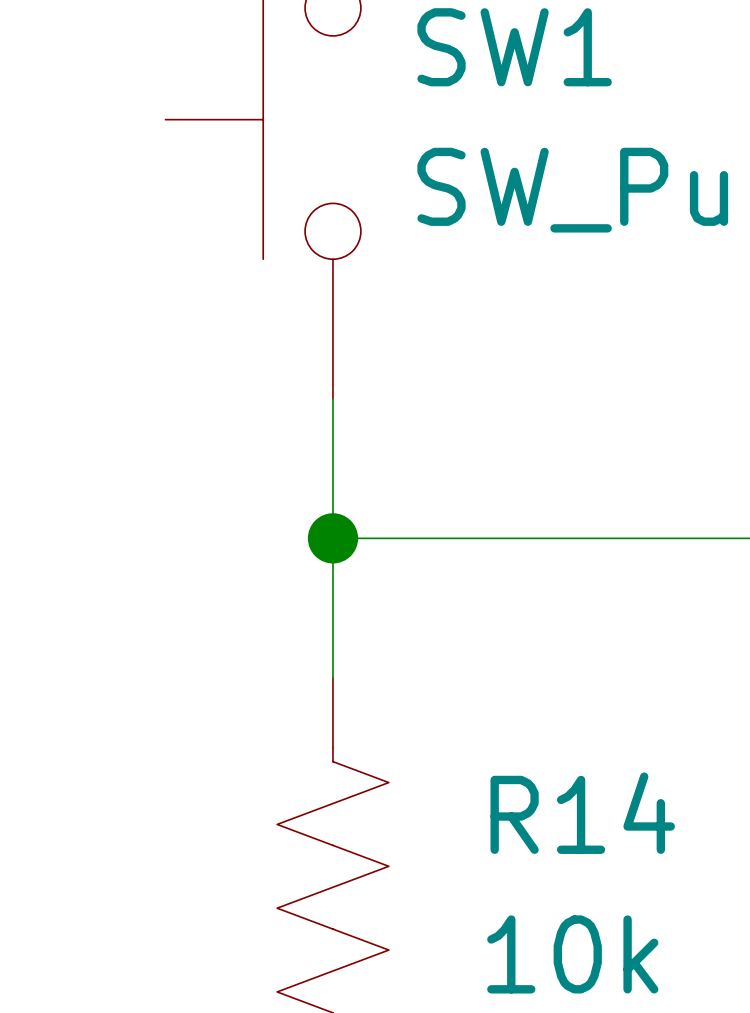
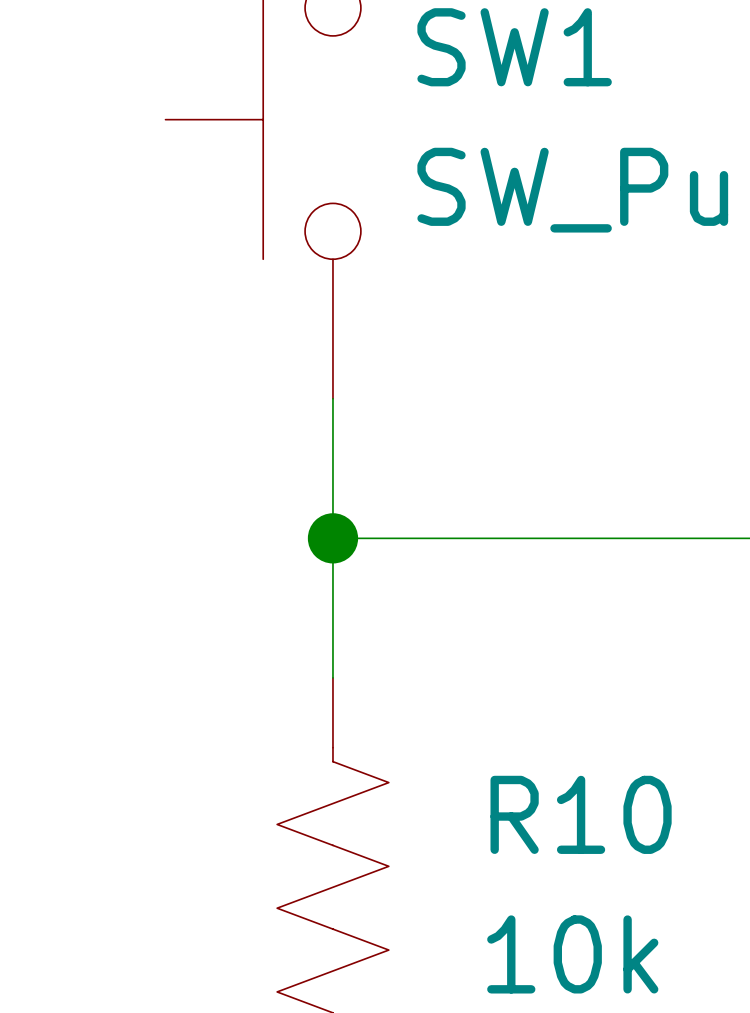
R14 name: R14 (582, 813) -> R10 (581, 814)

